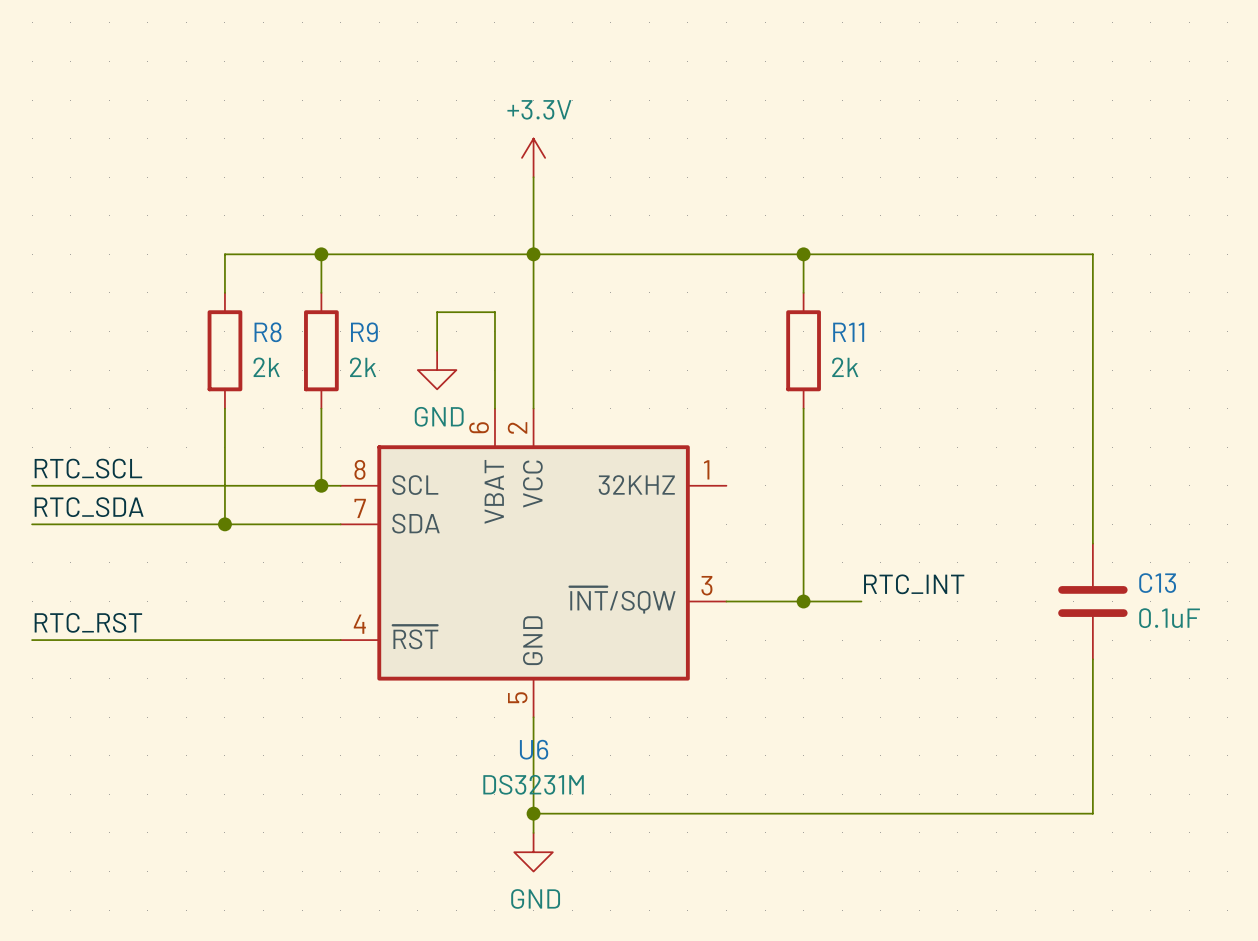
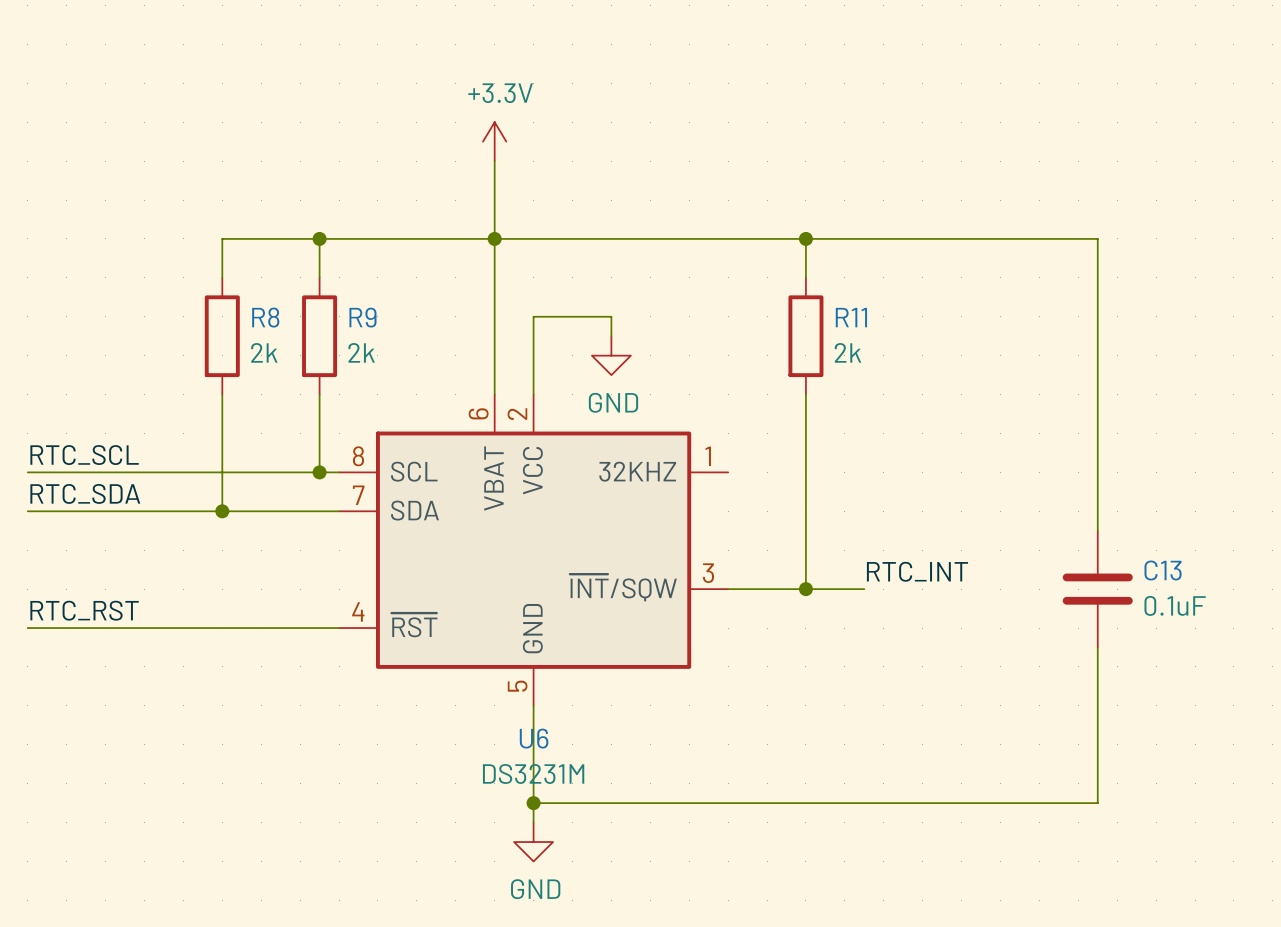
power symbol position: +3.3V (533, 157) -> +3.3V (494, 141)
wire: (533, 177) (533, 331) -> (611, 336) (611, 316) (533, 316)
junction position: (533, 254) -> (494, 238)
wire: (494, 312) (437, 312) (437, 350) -> (494, 297) (494, 161)
power symbol position: GND (437, 370) -> GND (611, 355)

